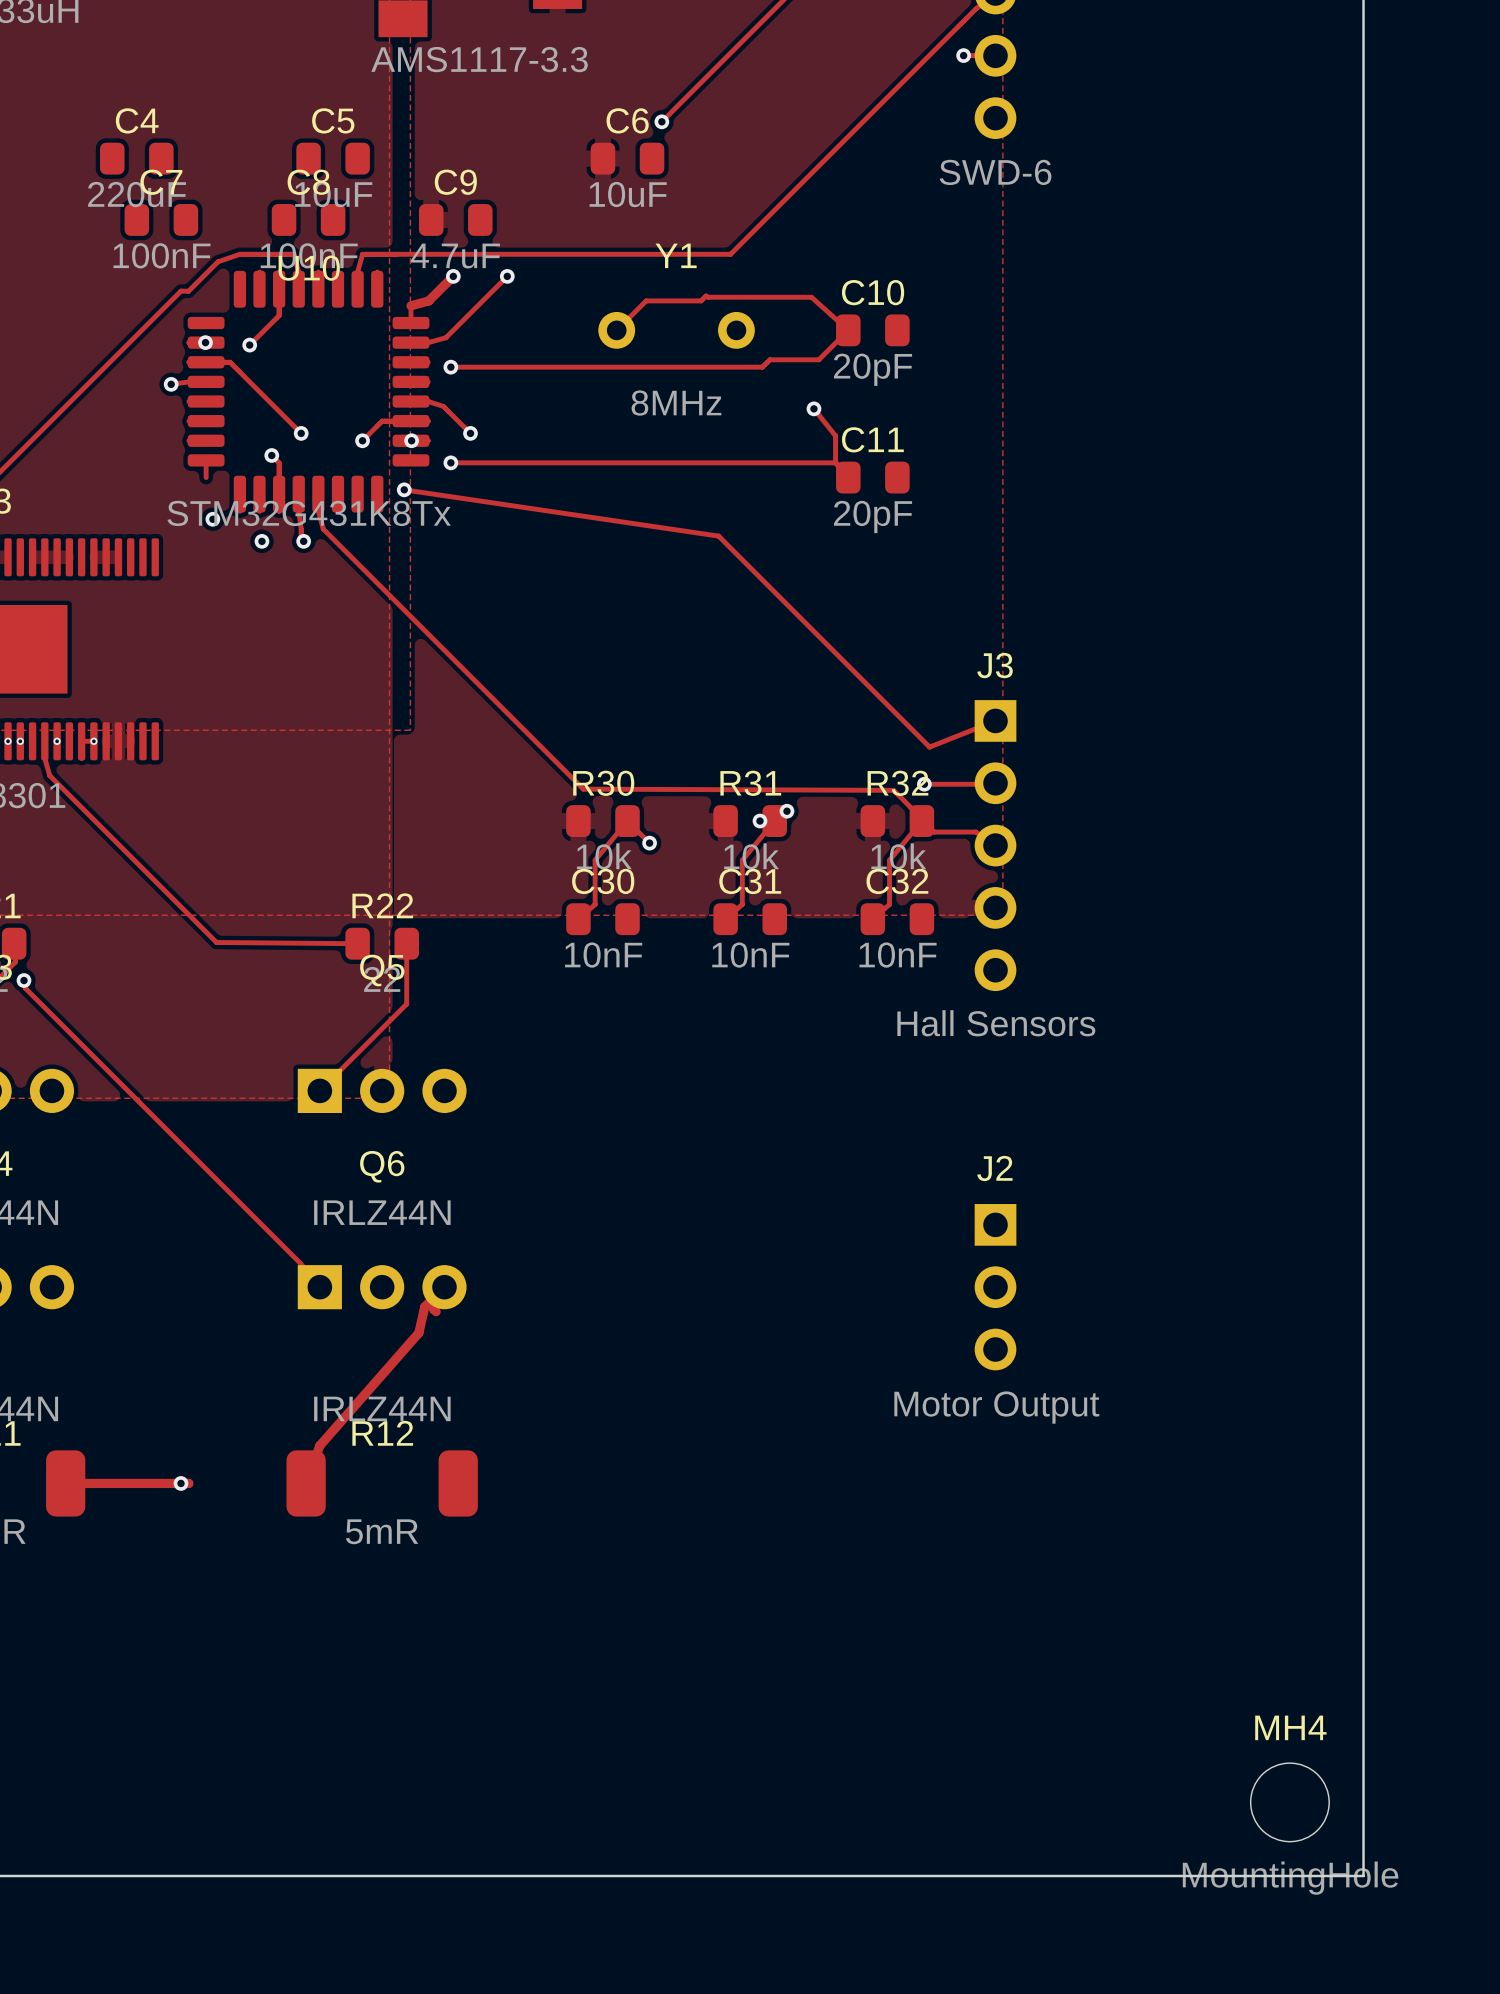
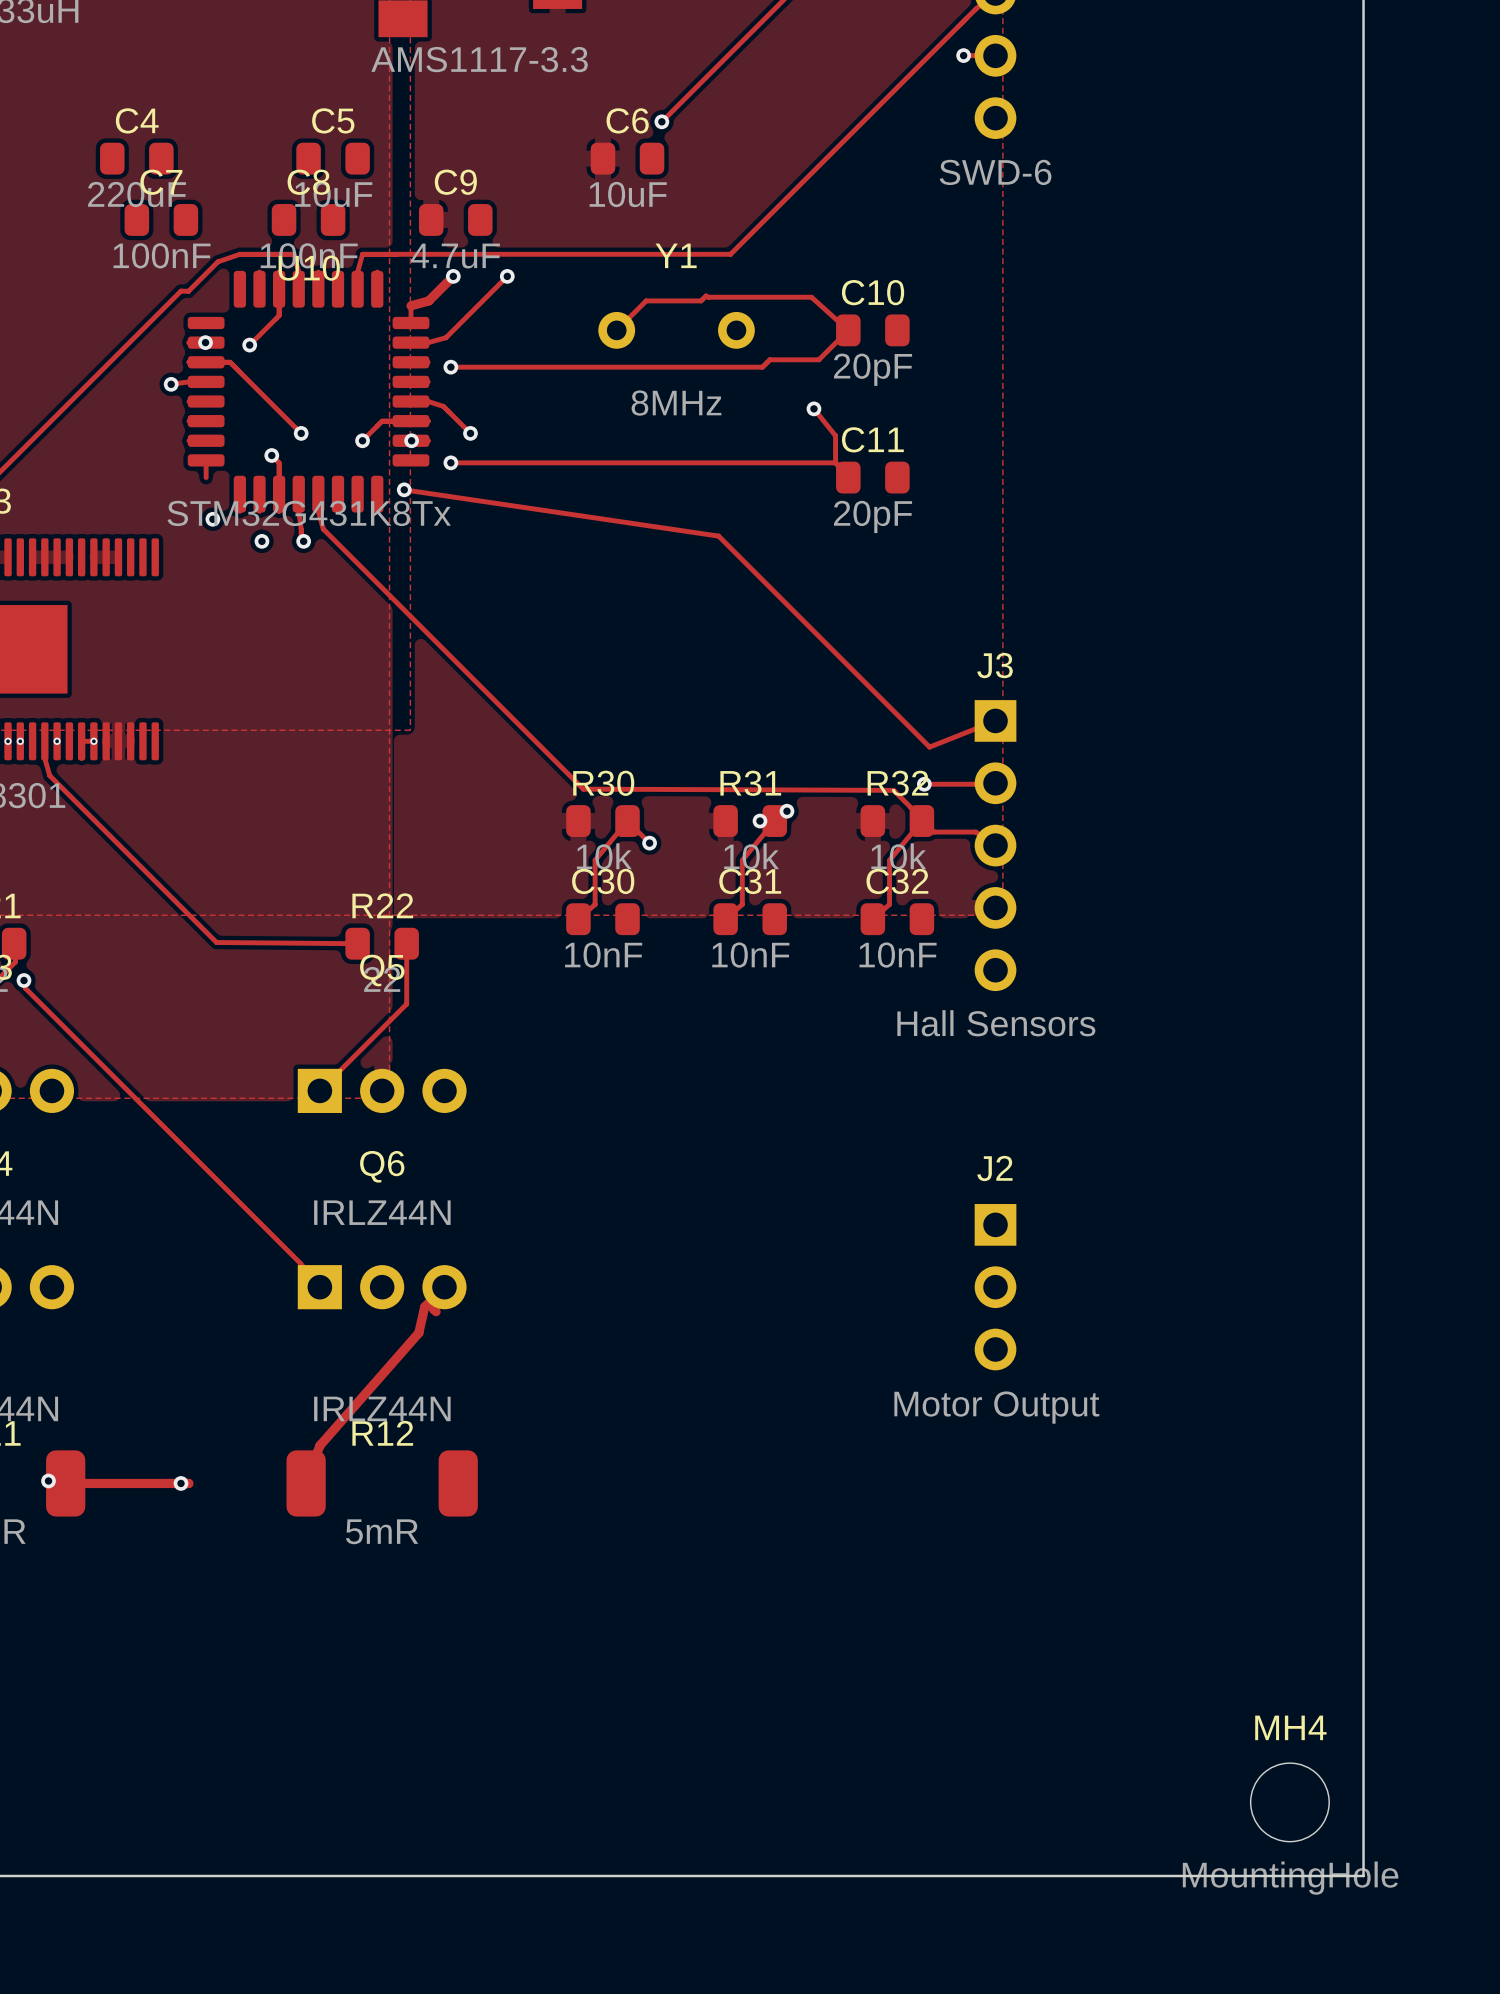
via: none -> (48, 1481)

